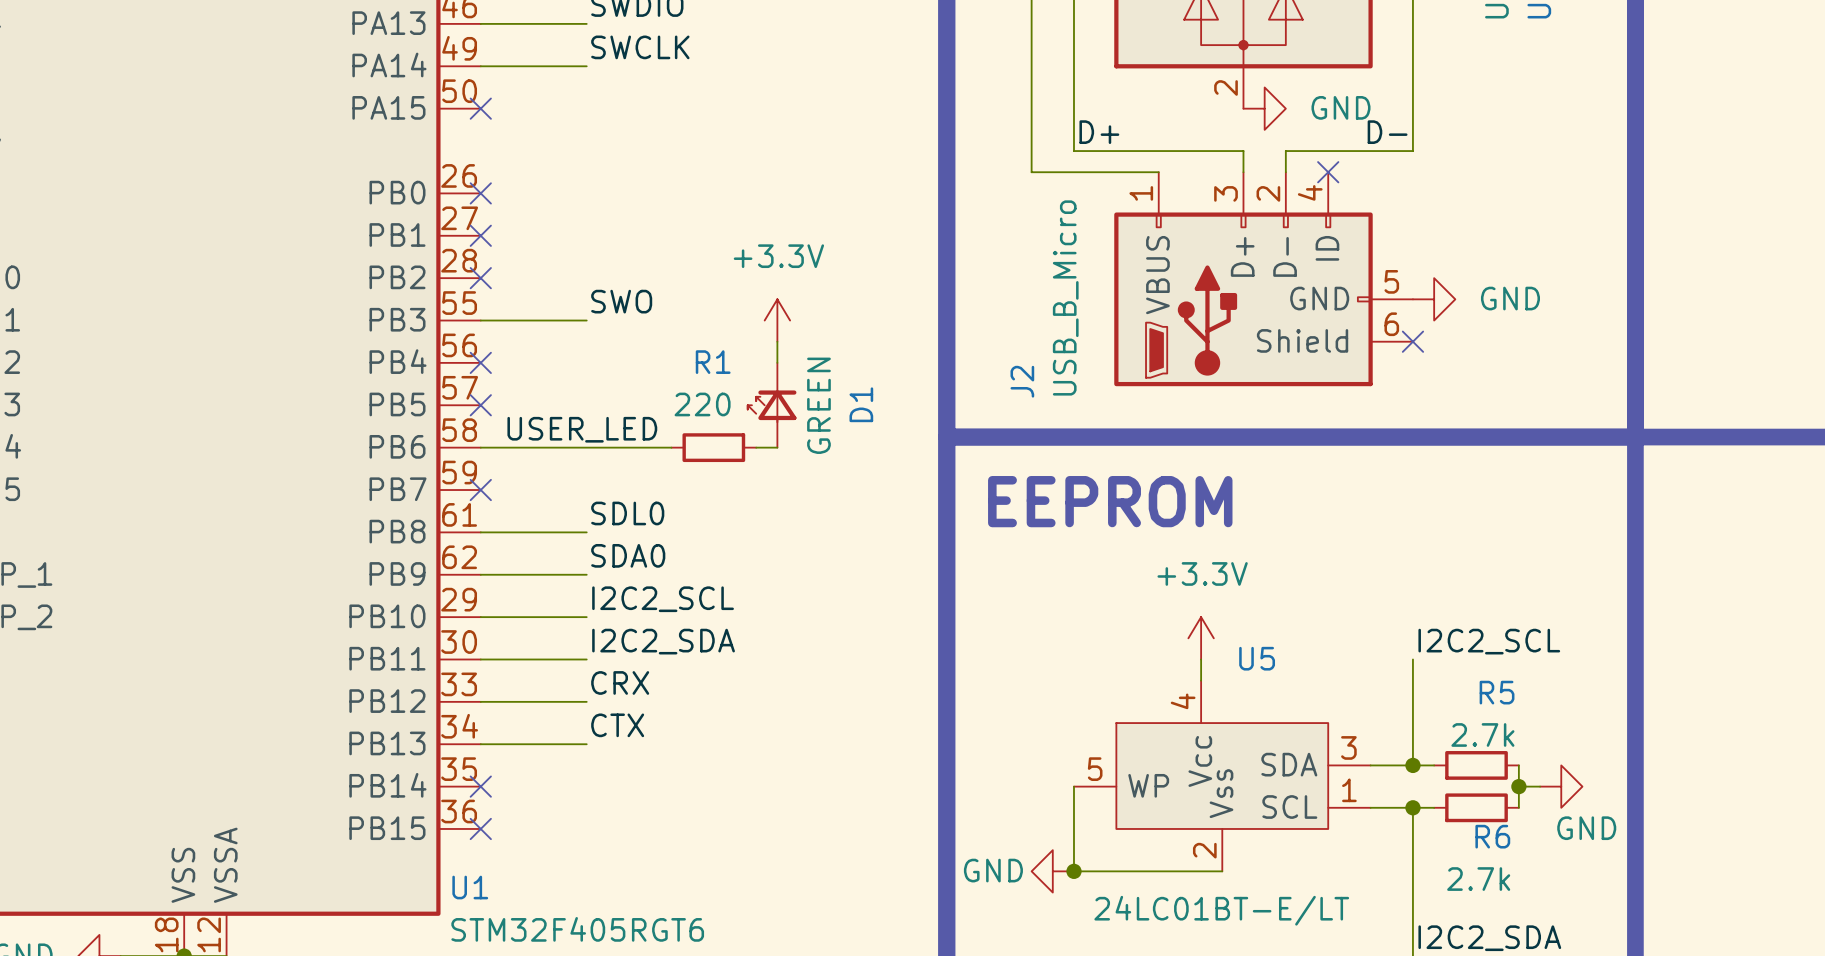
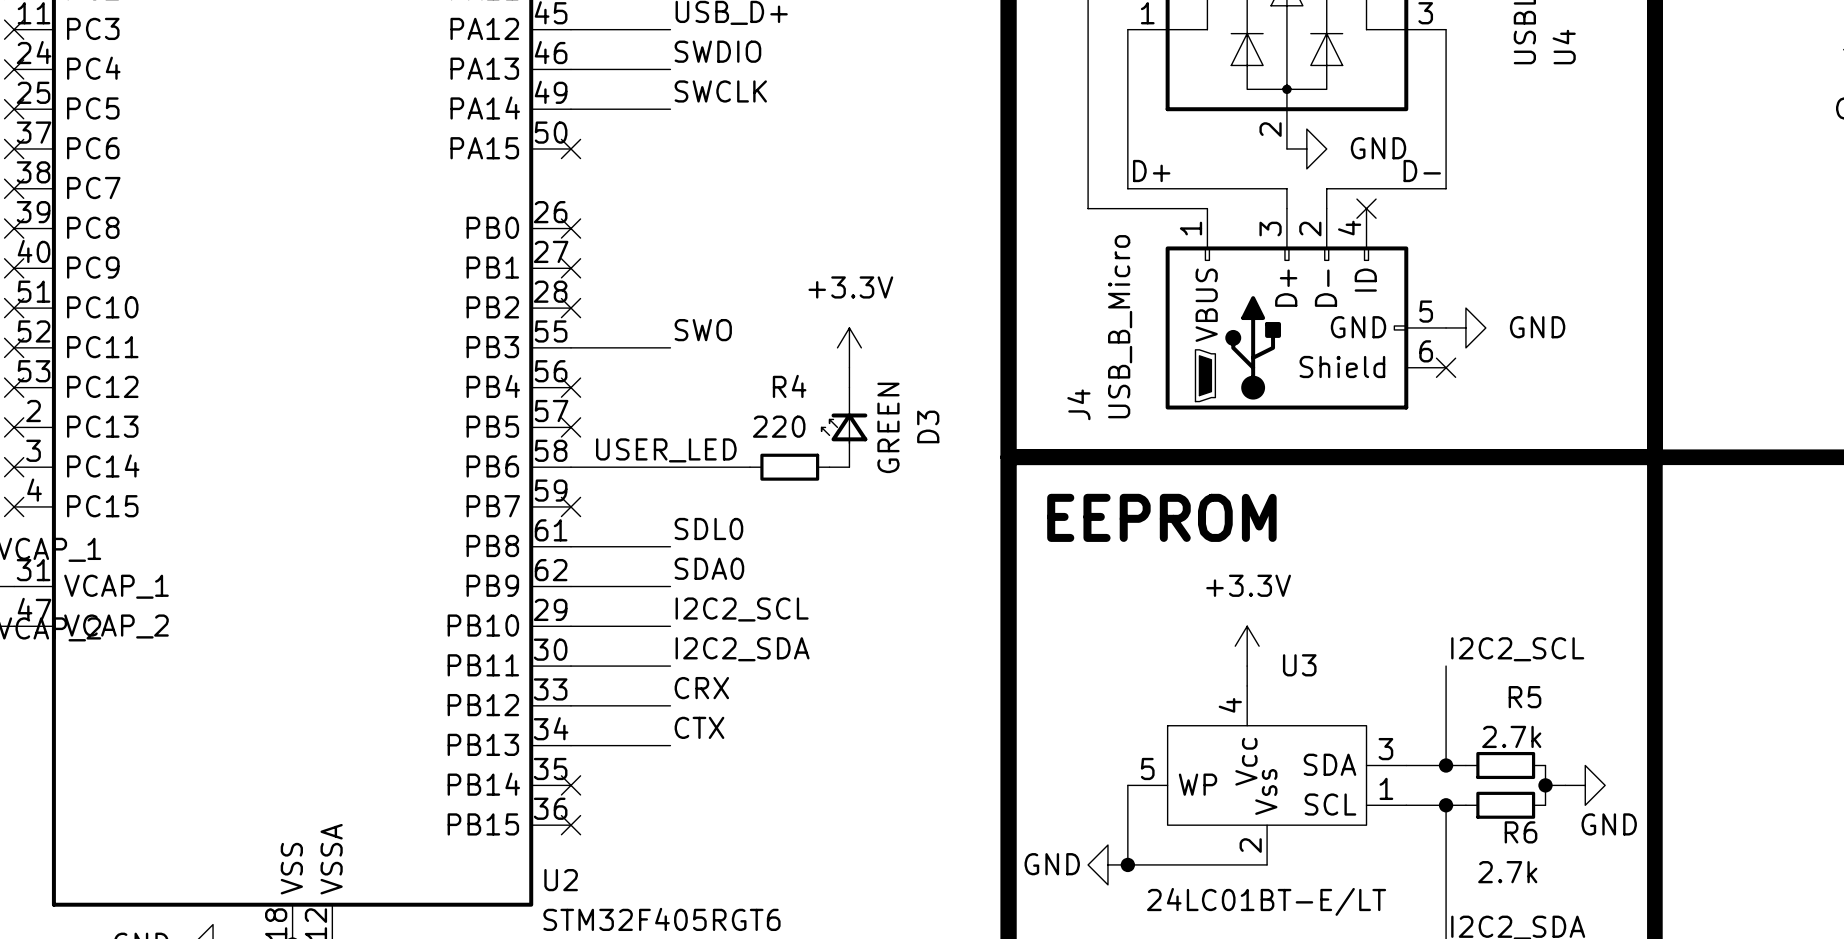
R1 name: R1 (713, 362) -> R4 (789, 386)
J2 name: J2 (1022, 381) -> J4 (1078, 404)
D1 name: D1 (861, 404) -> D3 (928, 426)
U5 name: U5 (1257, 658) -> U3 (1299, 665)
U1 name: U1 (470, 887) -> U2 (561, 880)

